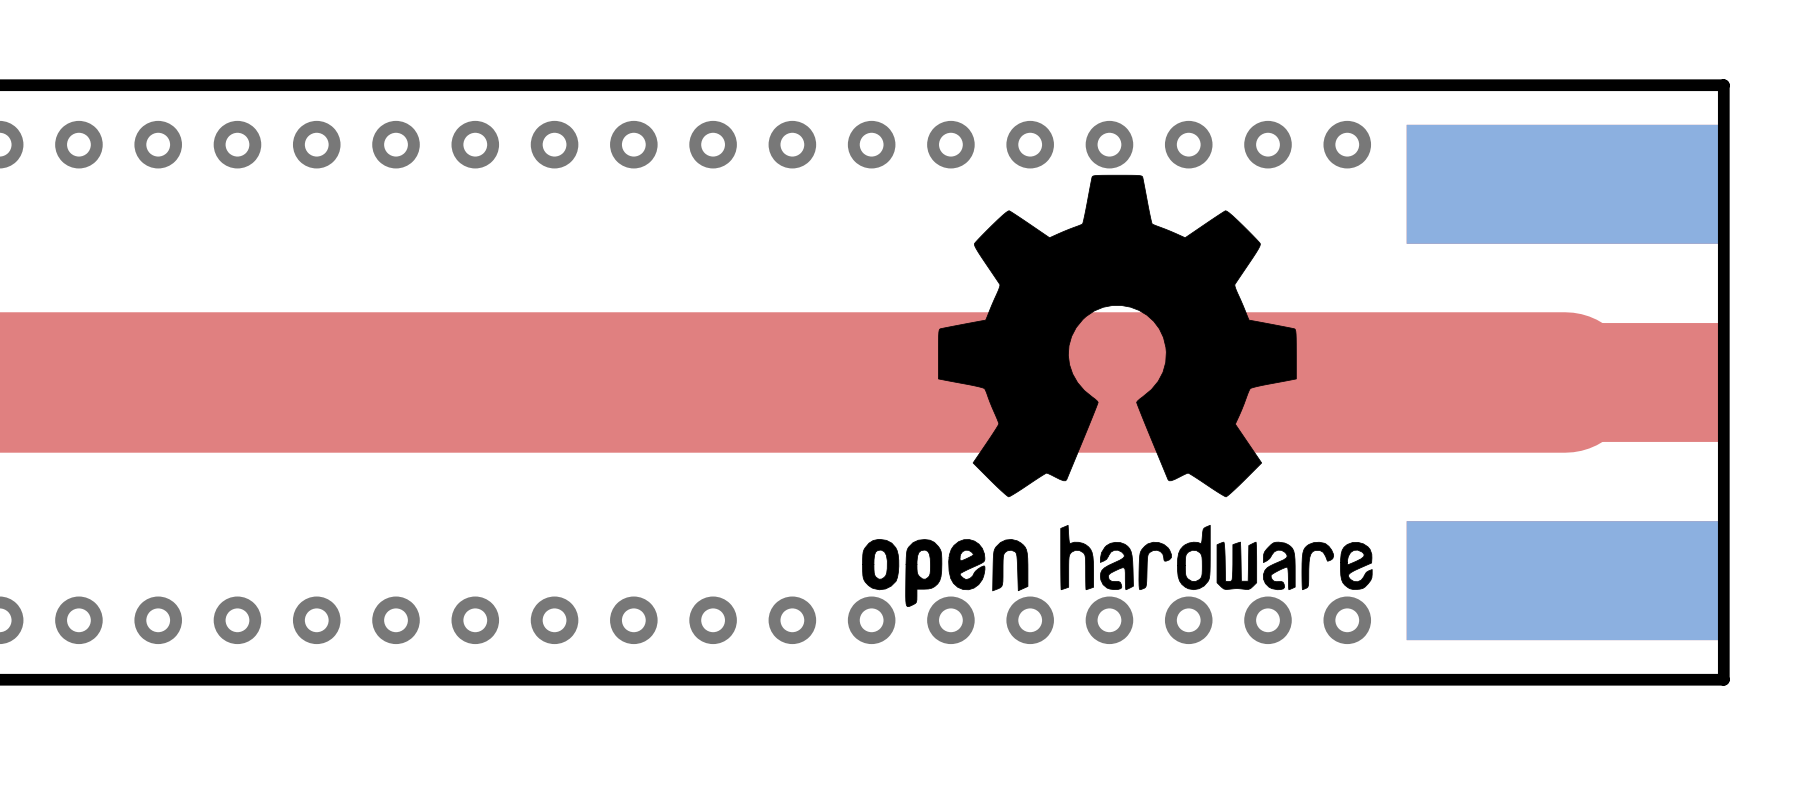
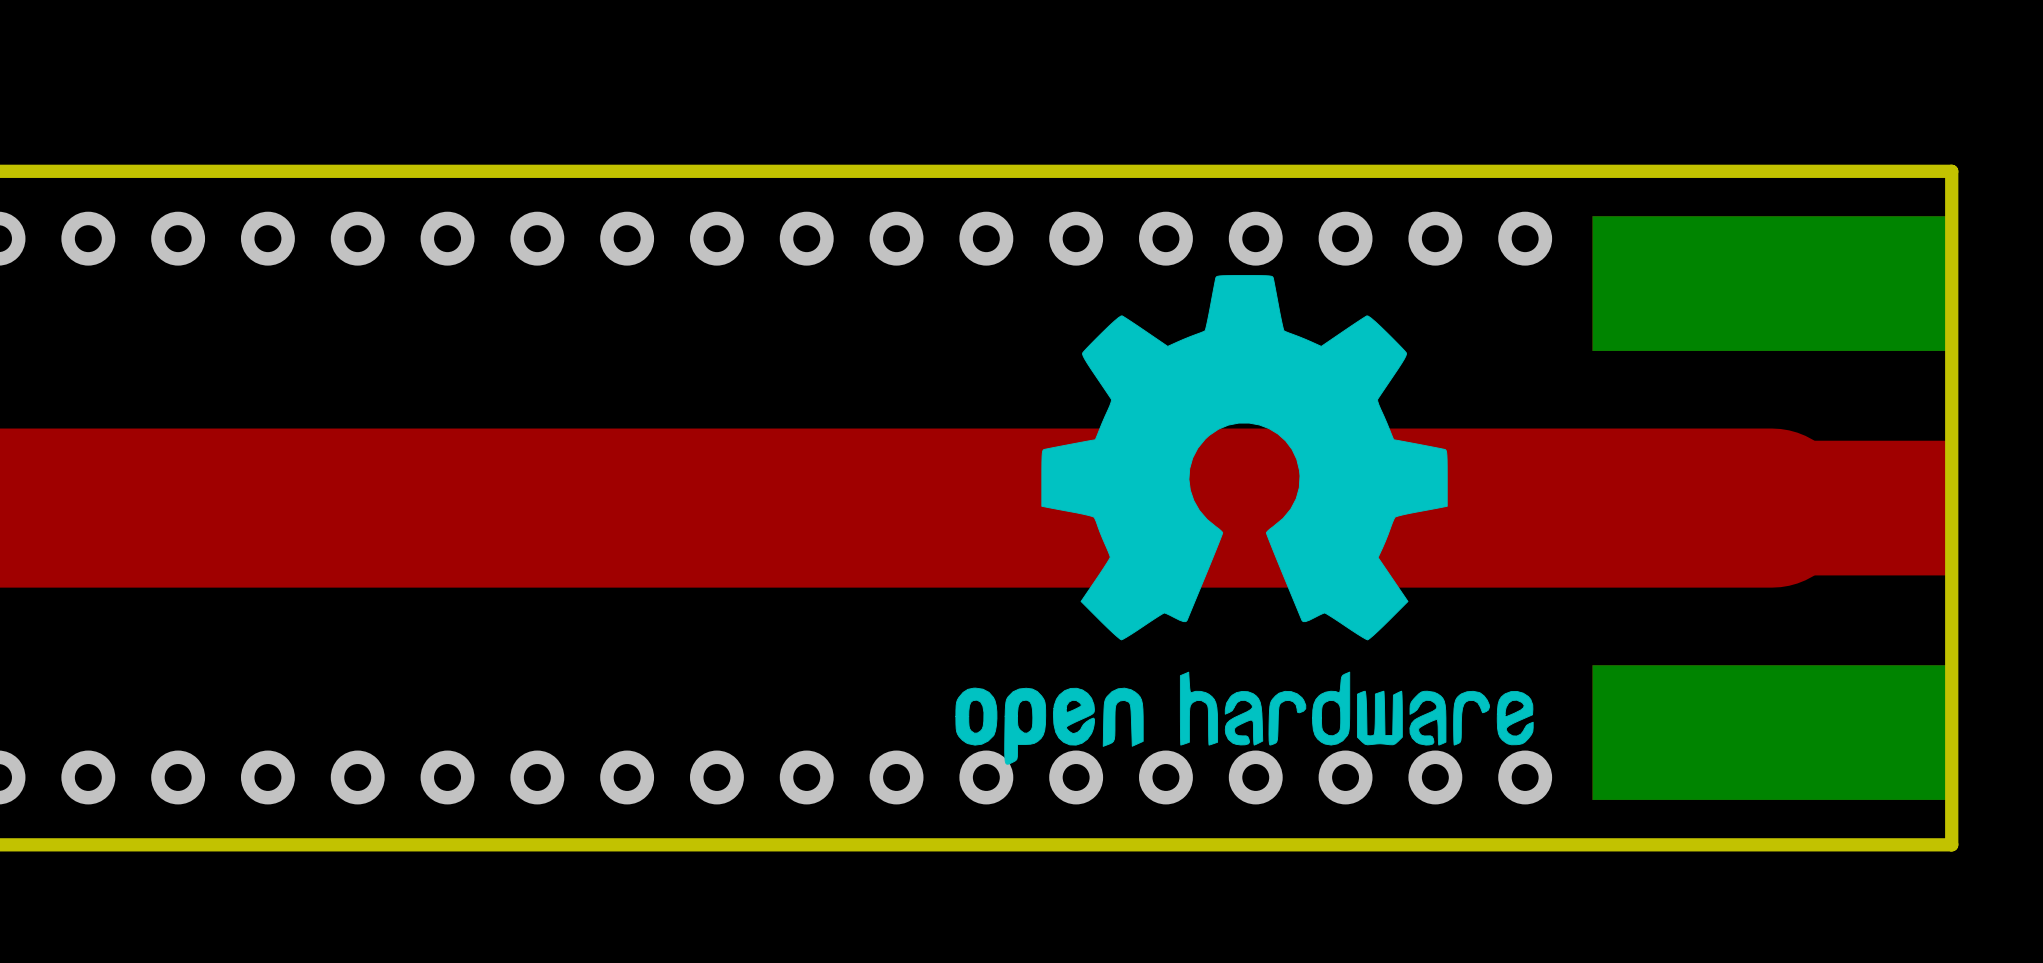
drawing position: (1117, 390) -> (1244, 519)

